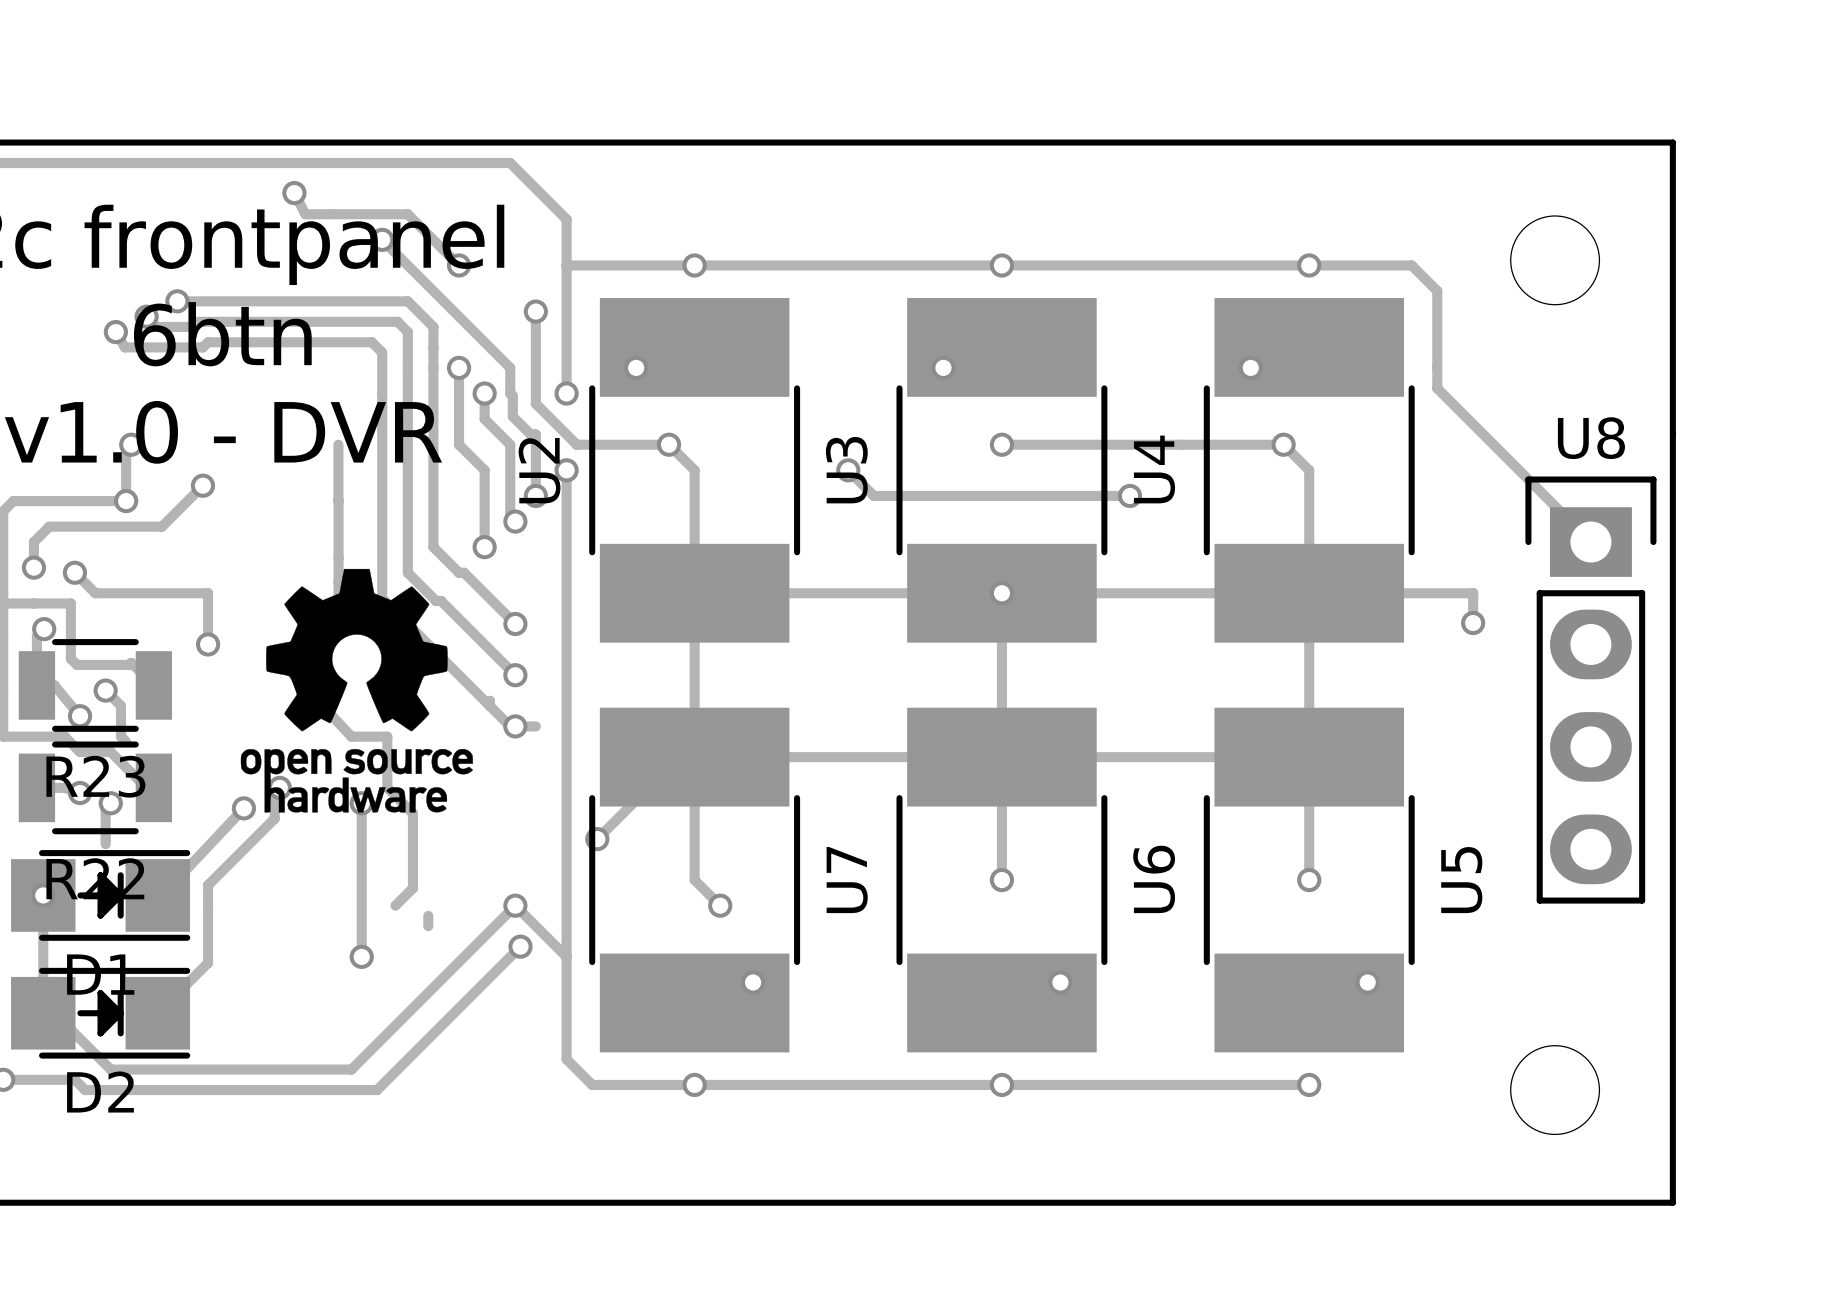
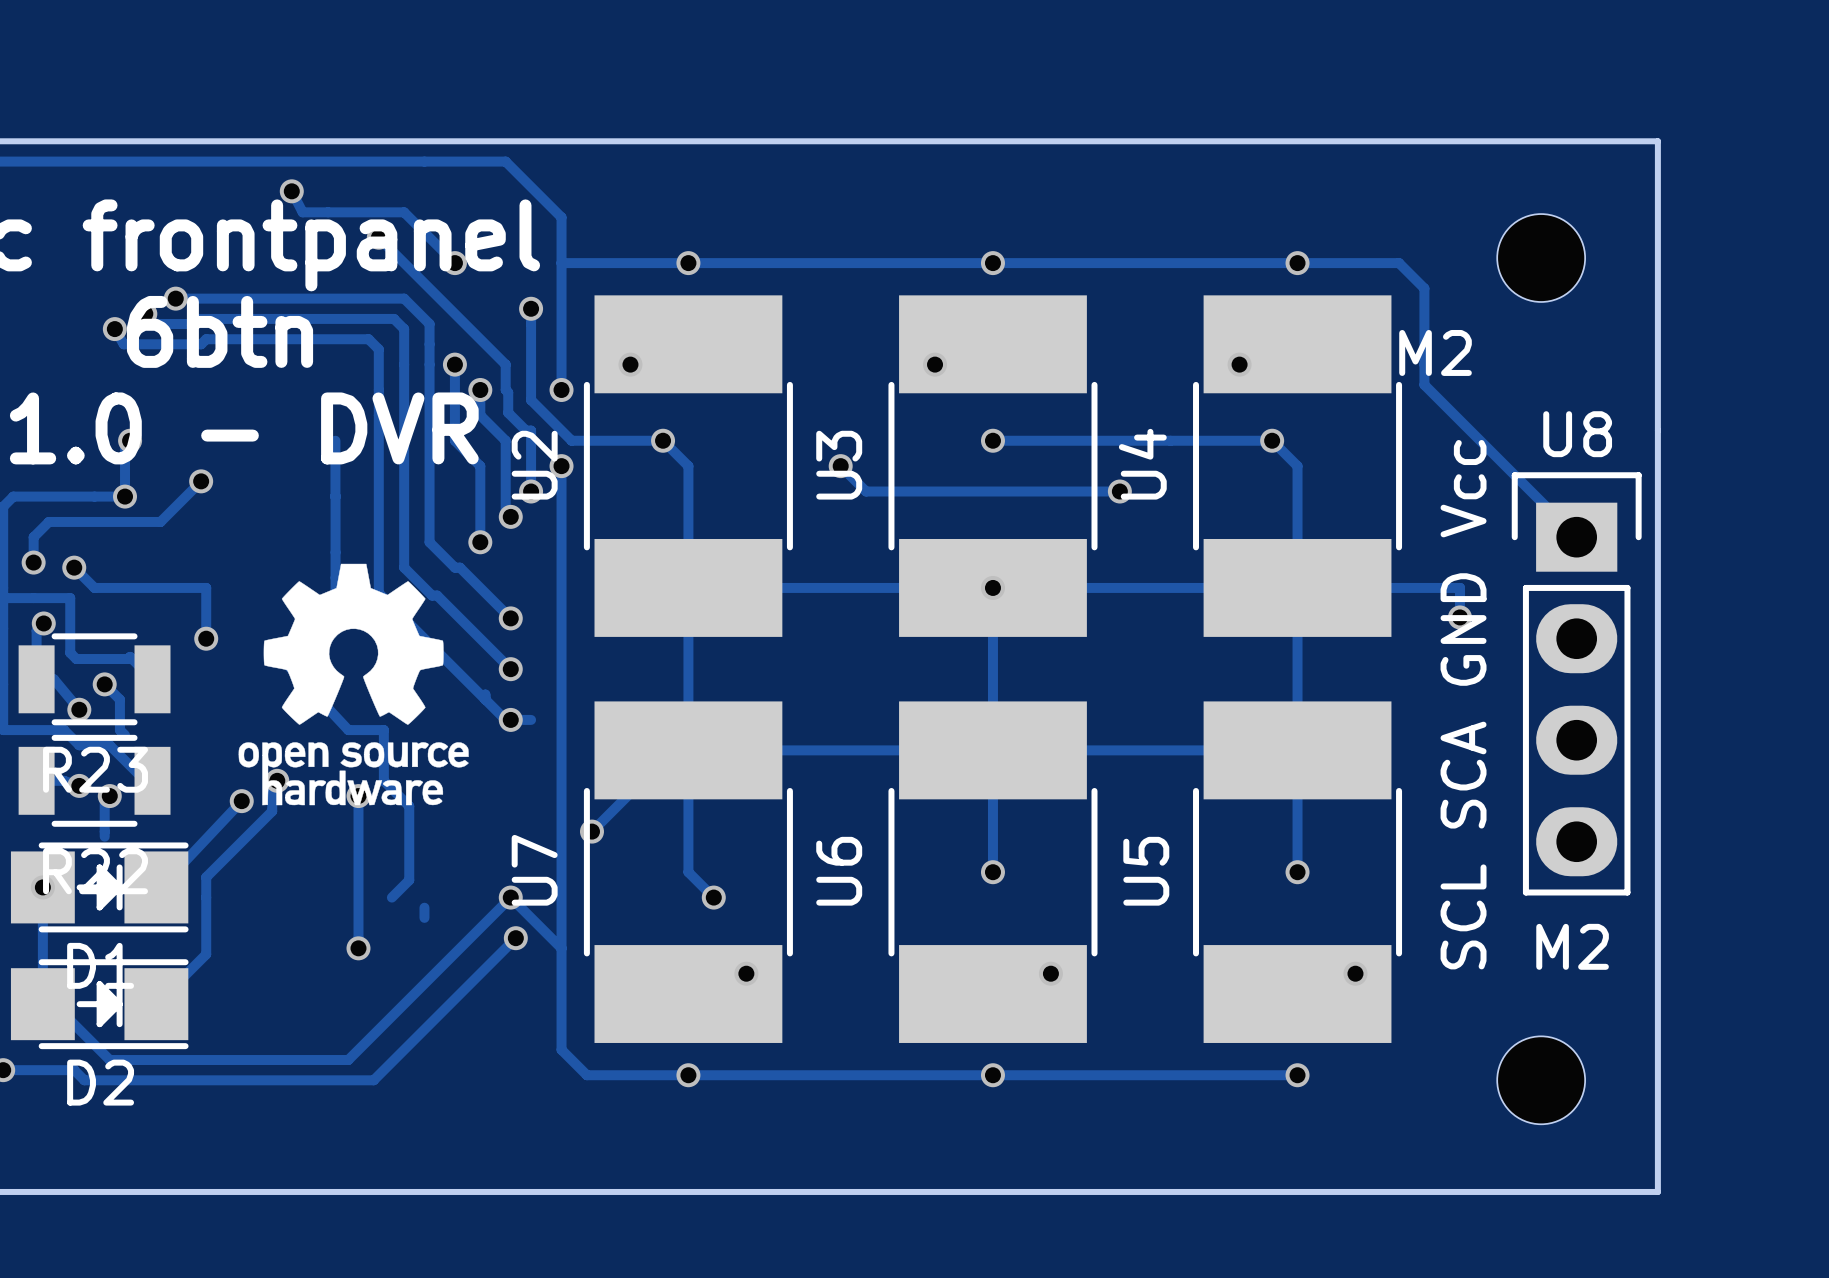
part value: none -> M2 (1435, 352)
U8 value: none -> SCL SCA GND Vcc (1463, 704)
U6 name position: U6 (1154, 879) -> U6 (839, 871)
U7 name position: U7 (847, 880) -> U7 (534, 870)
U5 name position: U5 (1461, 880) -> U5 (1146, 871)
part value: none -> M2 (1572, 946)

